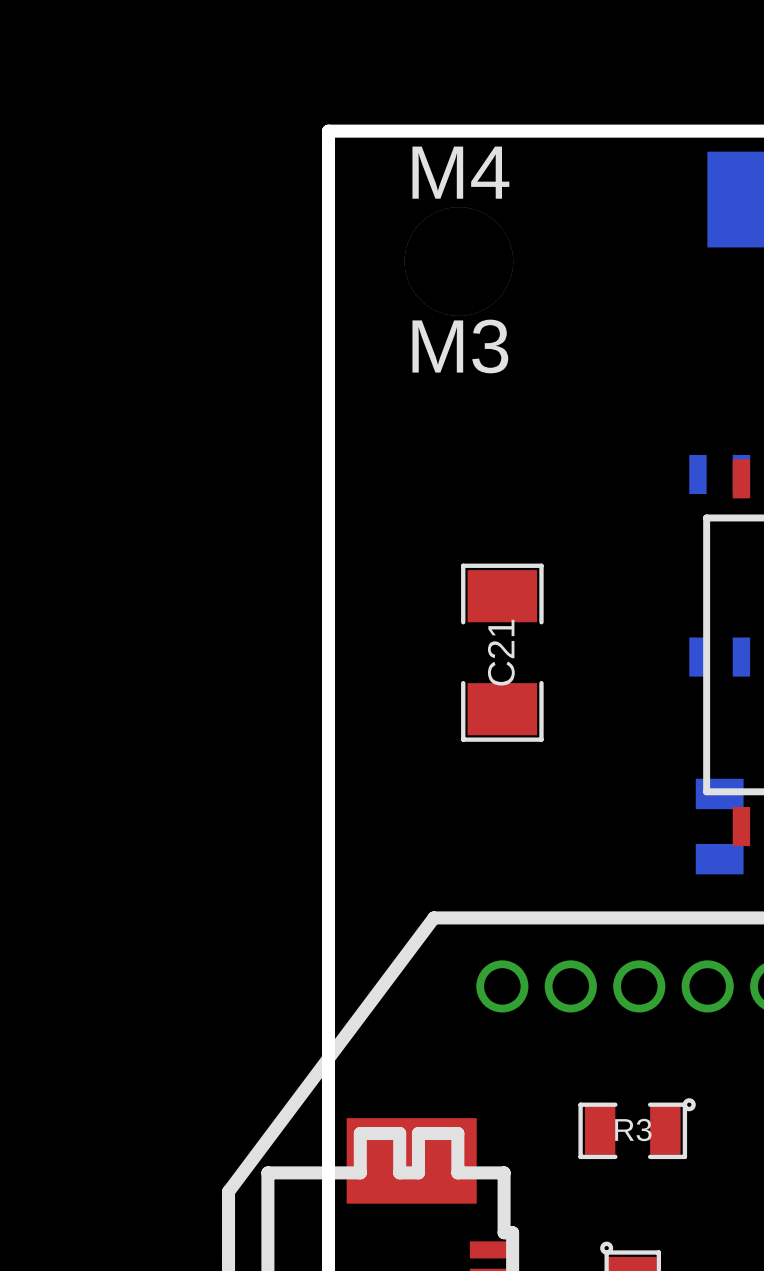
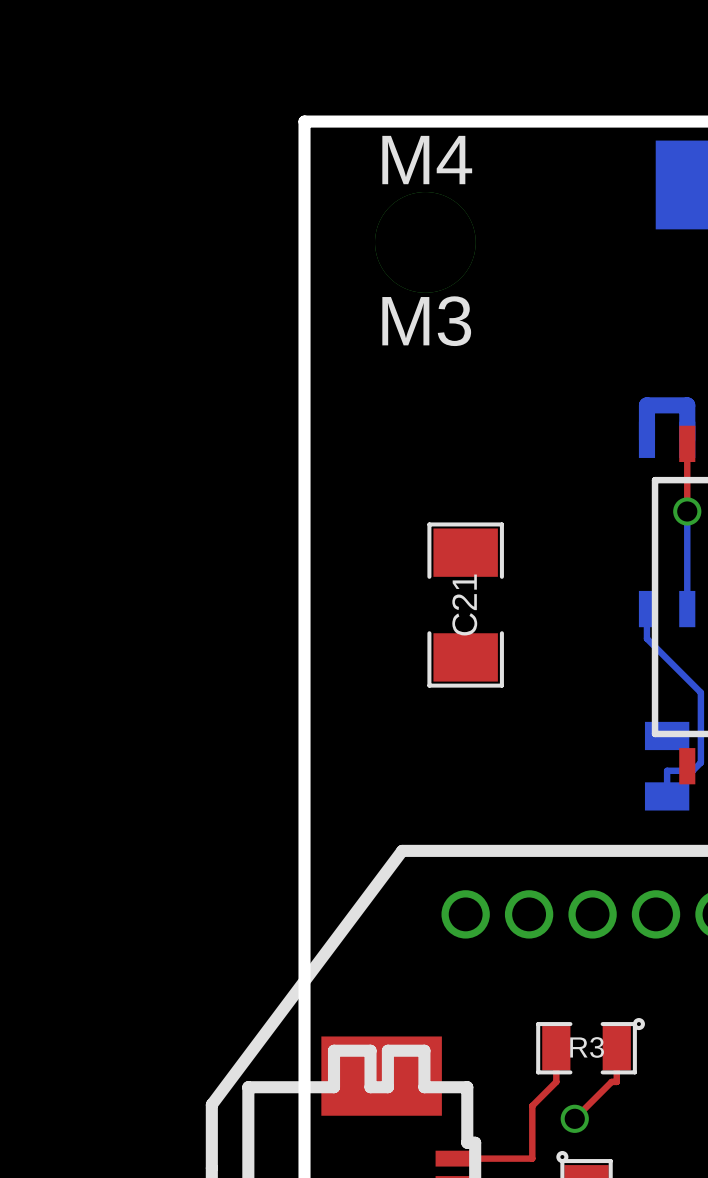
bottom track: none -> (646, 439) (646, 405) (687, 405) (687, 439)
top track: none -> (687, 443) (687, 511)
bottom track: none -> (687, 511) (687, 609)
via: none -> (687, 511)
bottom track: none -> (646, 609) (646, 638) (700, 692) (700, 762) (692, 770) (667, 770) (667, 796)
top track: none -> (556, 1048) (556, 1081) (532, 1105) (532, 1158) (457, 1158)
top track: none -> (616, 1048) (616, 1081) (611, 1081) (574, 1118)
via: none -> (574, 1118)

